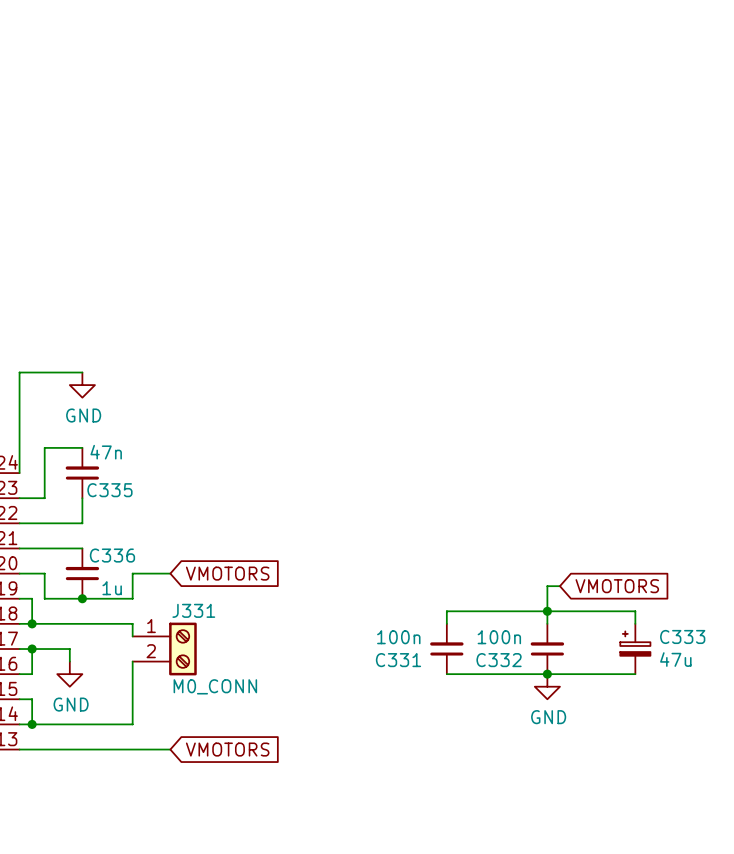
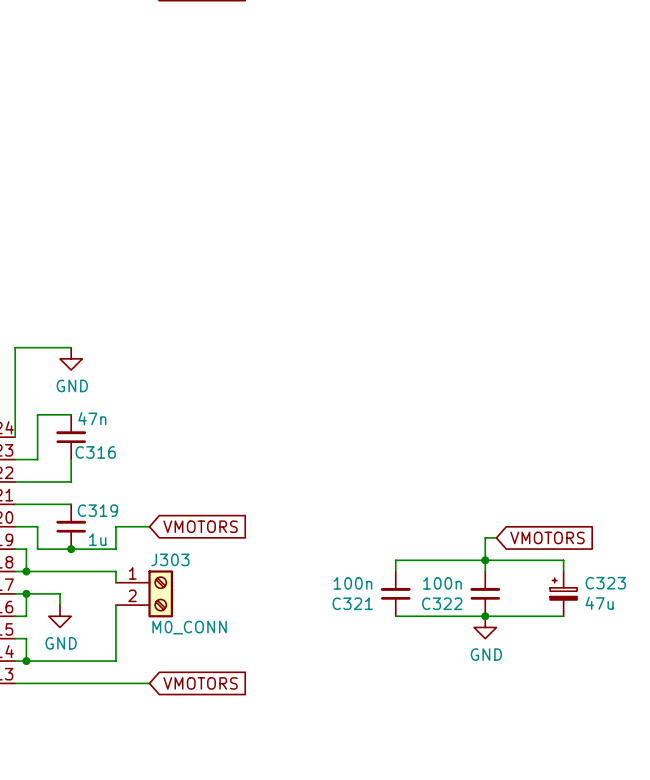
C335 name: C335 (109, 490) -> C316 (95, 452)
C336 name: C336 (112, 555) -> C319 (97, 510)
J331 name: J331 (193, 610) -> J303 (170, 559)
C333 name: C333 (682, 636) -> C323 (605, 583)
C331 name: C331 (398, 660) -> C321 (352, 603)
C332 name: C332 (499, 660) -> C322 (442, 603)

